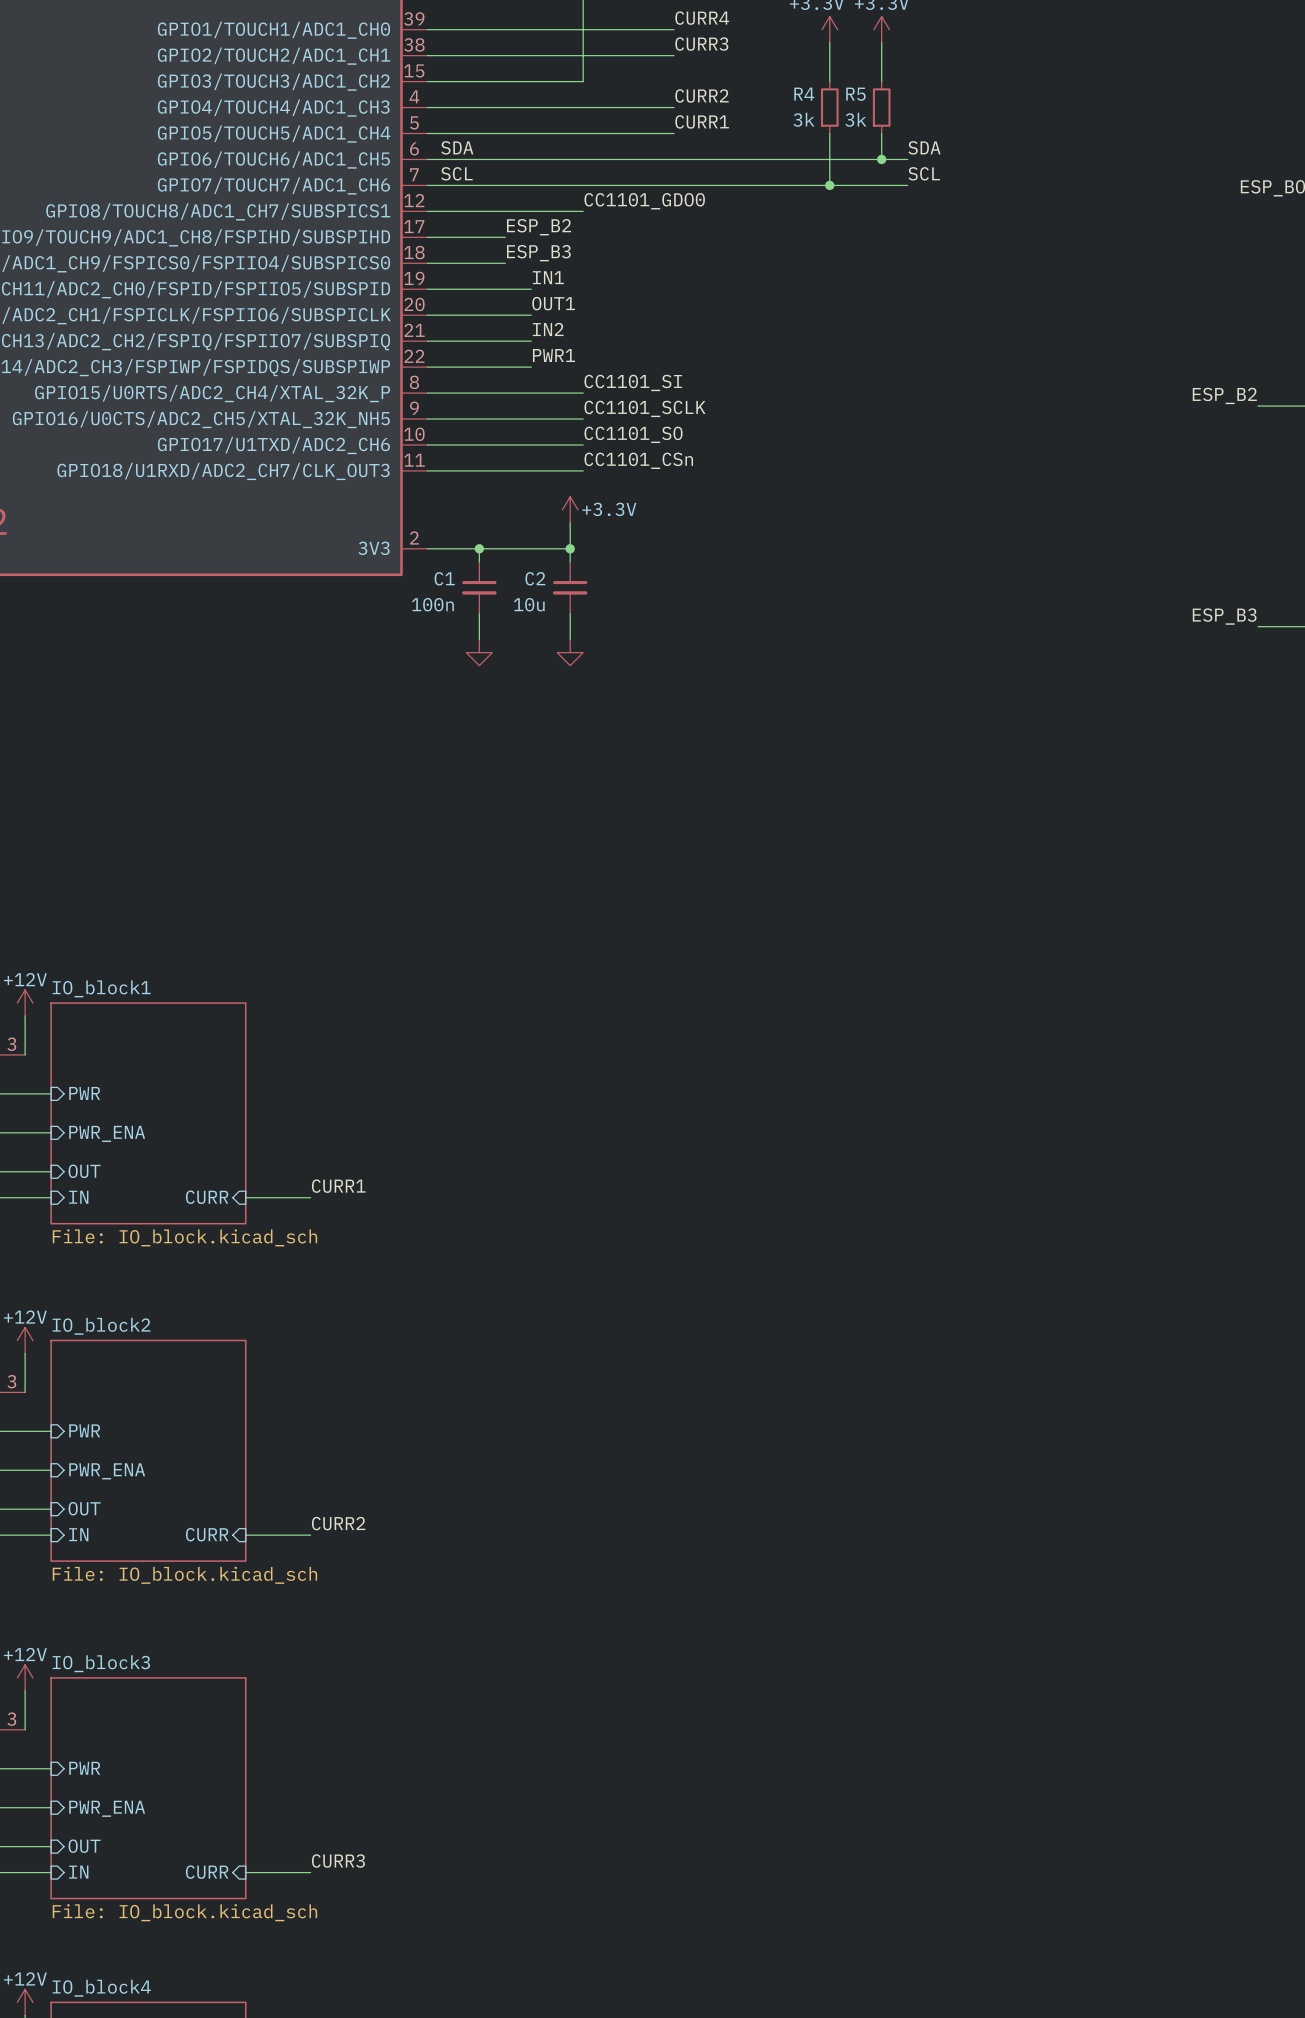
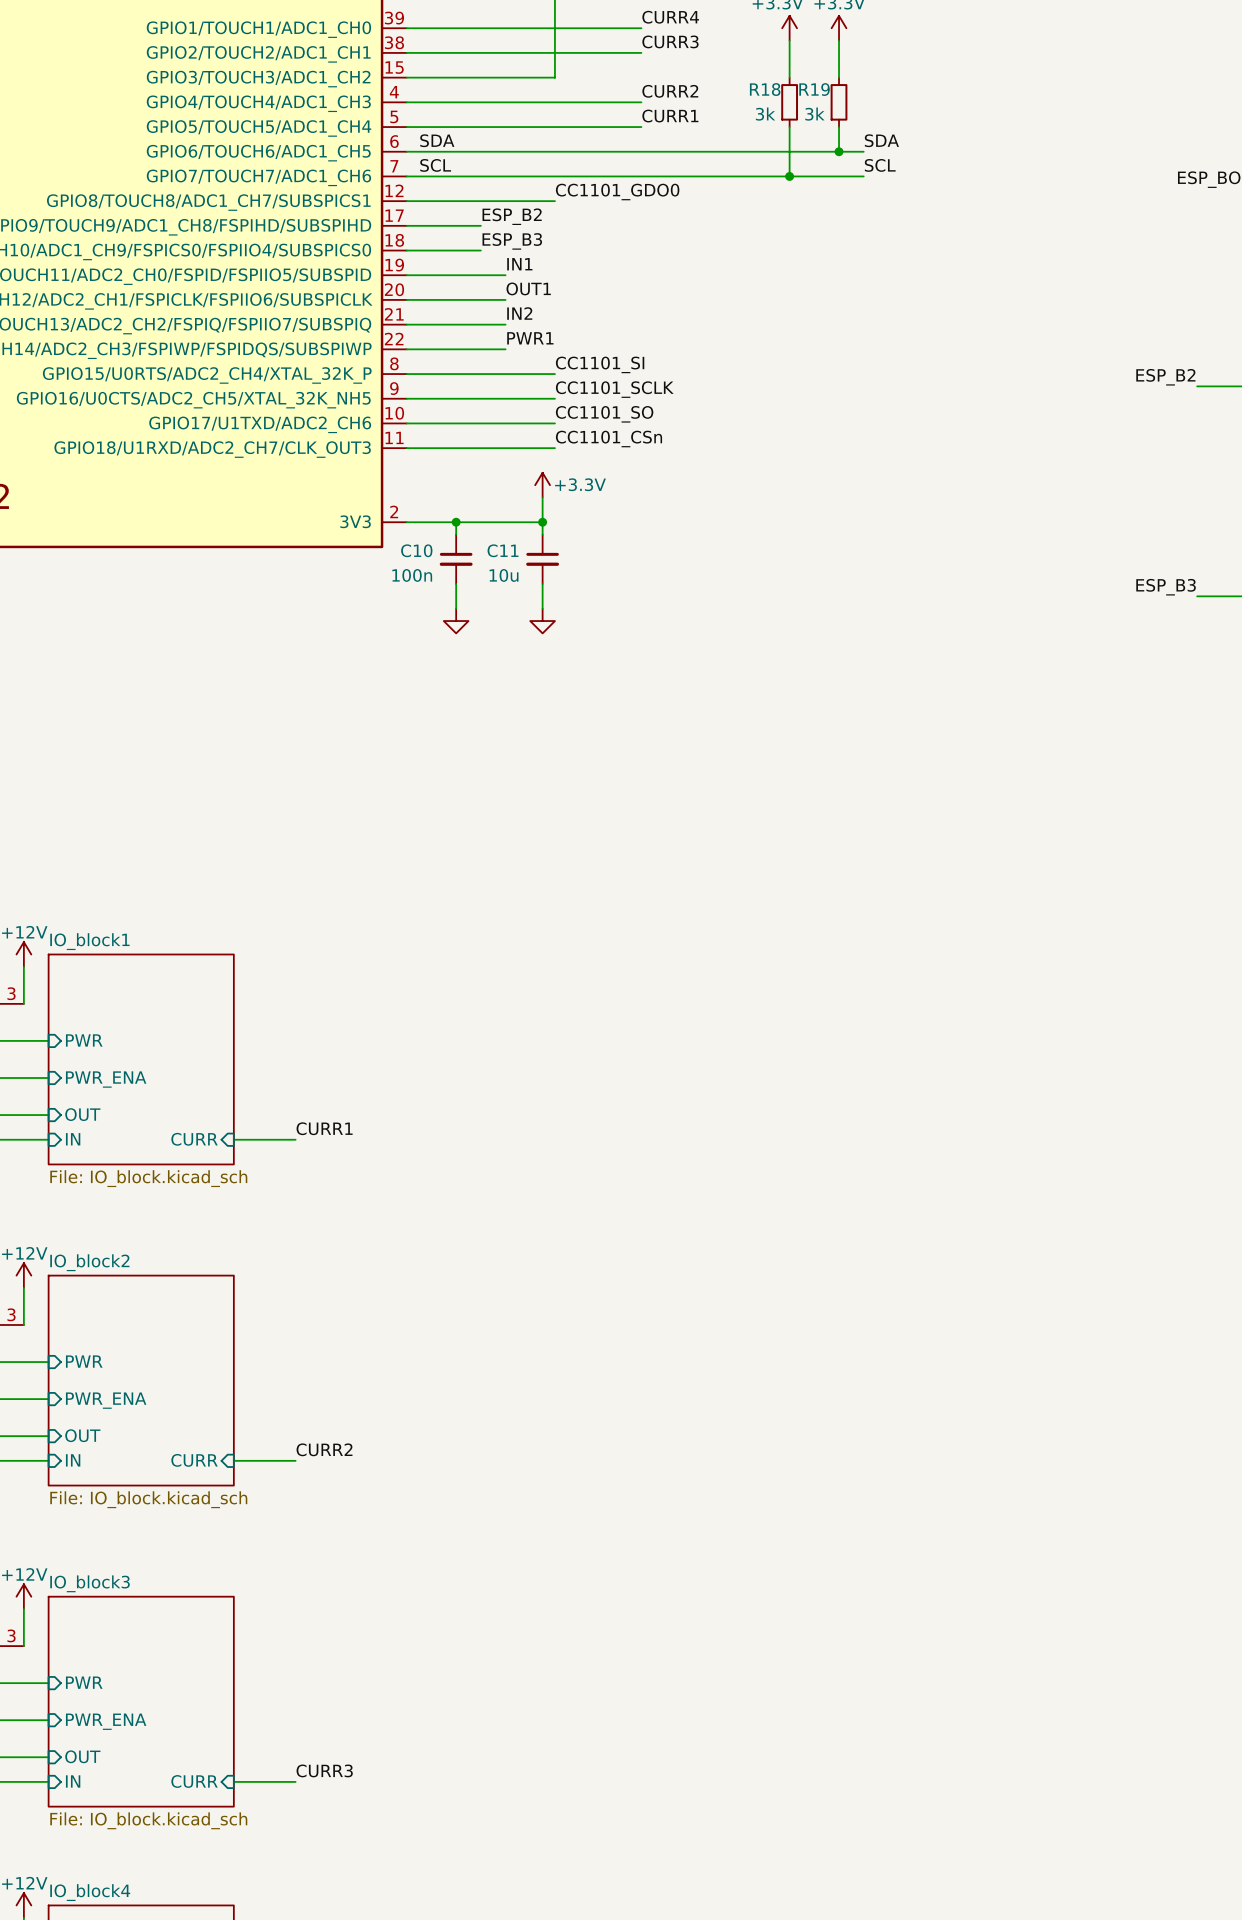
R4 name: R4 (804, 94) -> R18 (765, 89)
R5 name: R5 (855, 94) -> R19 (814, 89)
C1 name: C1 (444, 578) -> C10 (416, 550)
C2 name: C2 (535, 578) -> C11 (503, 550)

